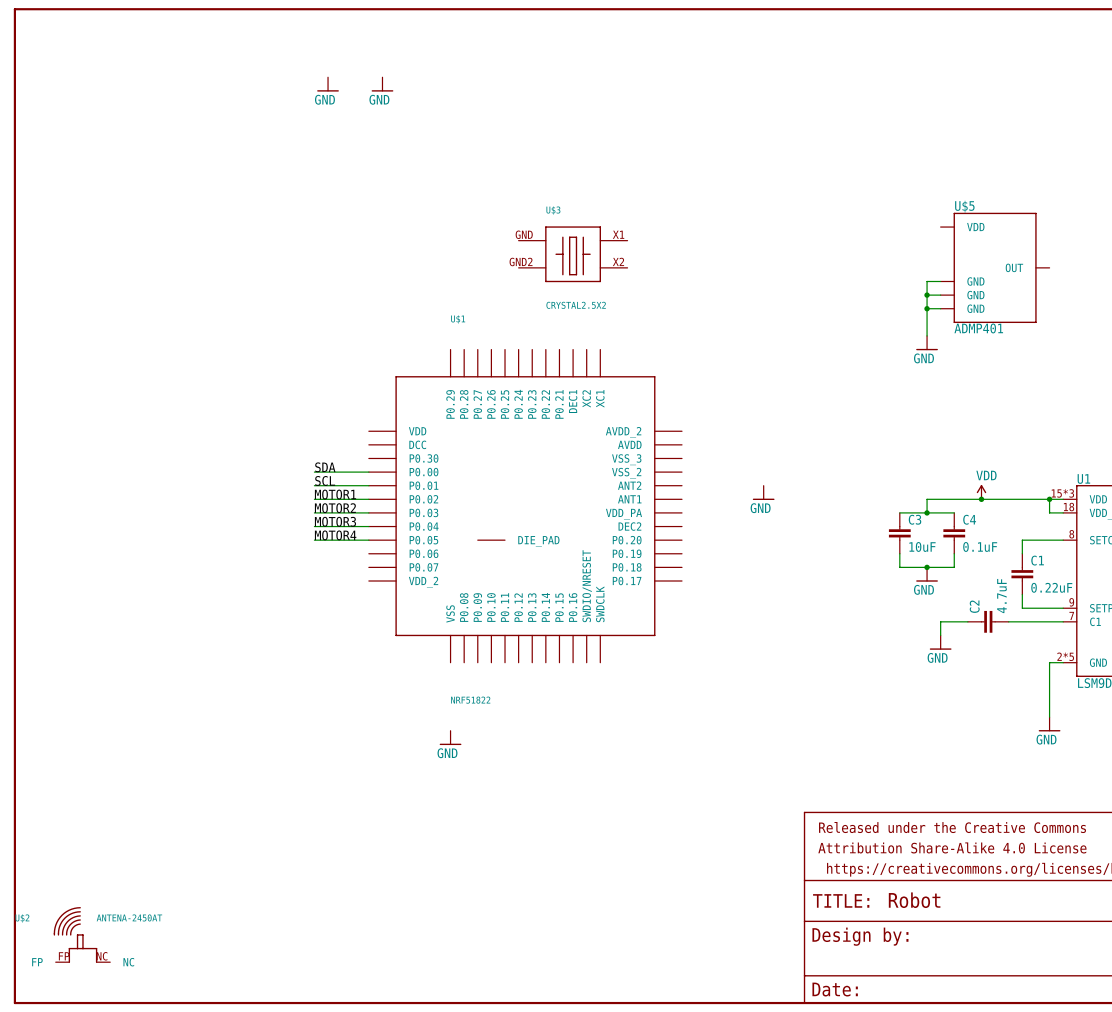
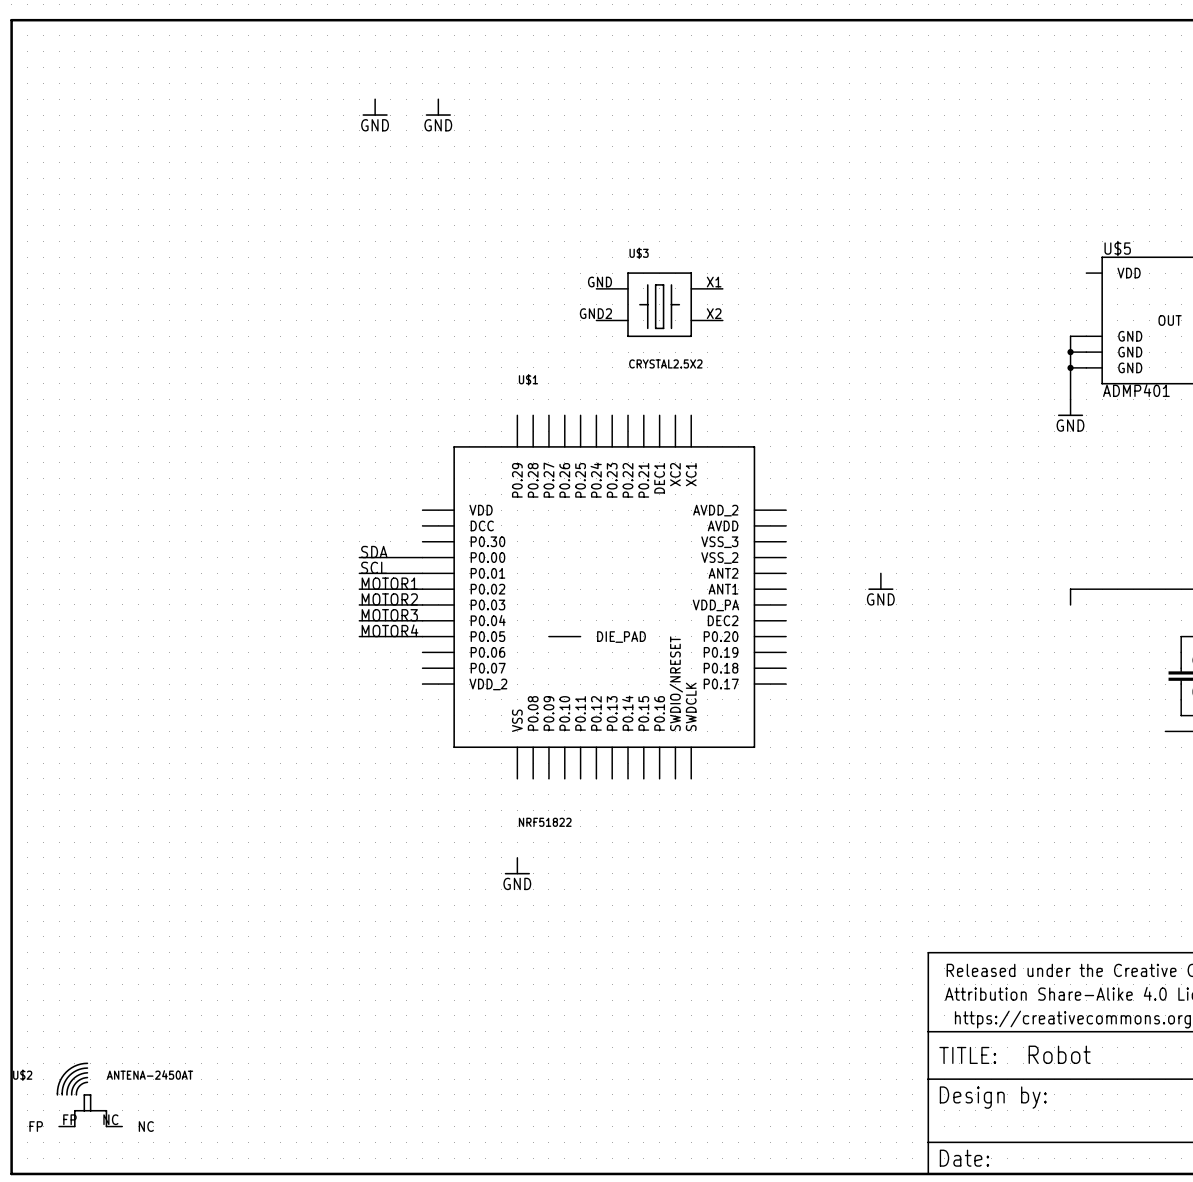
power symbol: VDD (981, 492) -> none
junction: (981, 499) -> none
wire: (899, 512) (954, 512) -> none
junction: (927, 512) -> none
C3: 10uF (899, 533) -> none
C4: 0.1uF (954, 533) -> none
wire: (899, 553) (899, 567) (954, 567) (954, 553) -> none
junction: (927, 567) -> none
power symbol: GND (927, 574) -> none
wire: (967, 621) (940, 621) (940, 635) -> none
C2: 4.7uF (988, 621) -> none
power symbol: GND (940, 642) -> none

